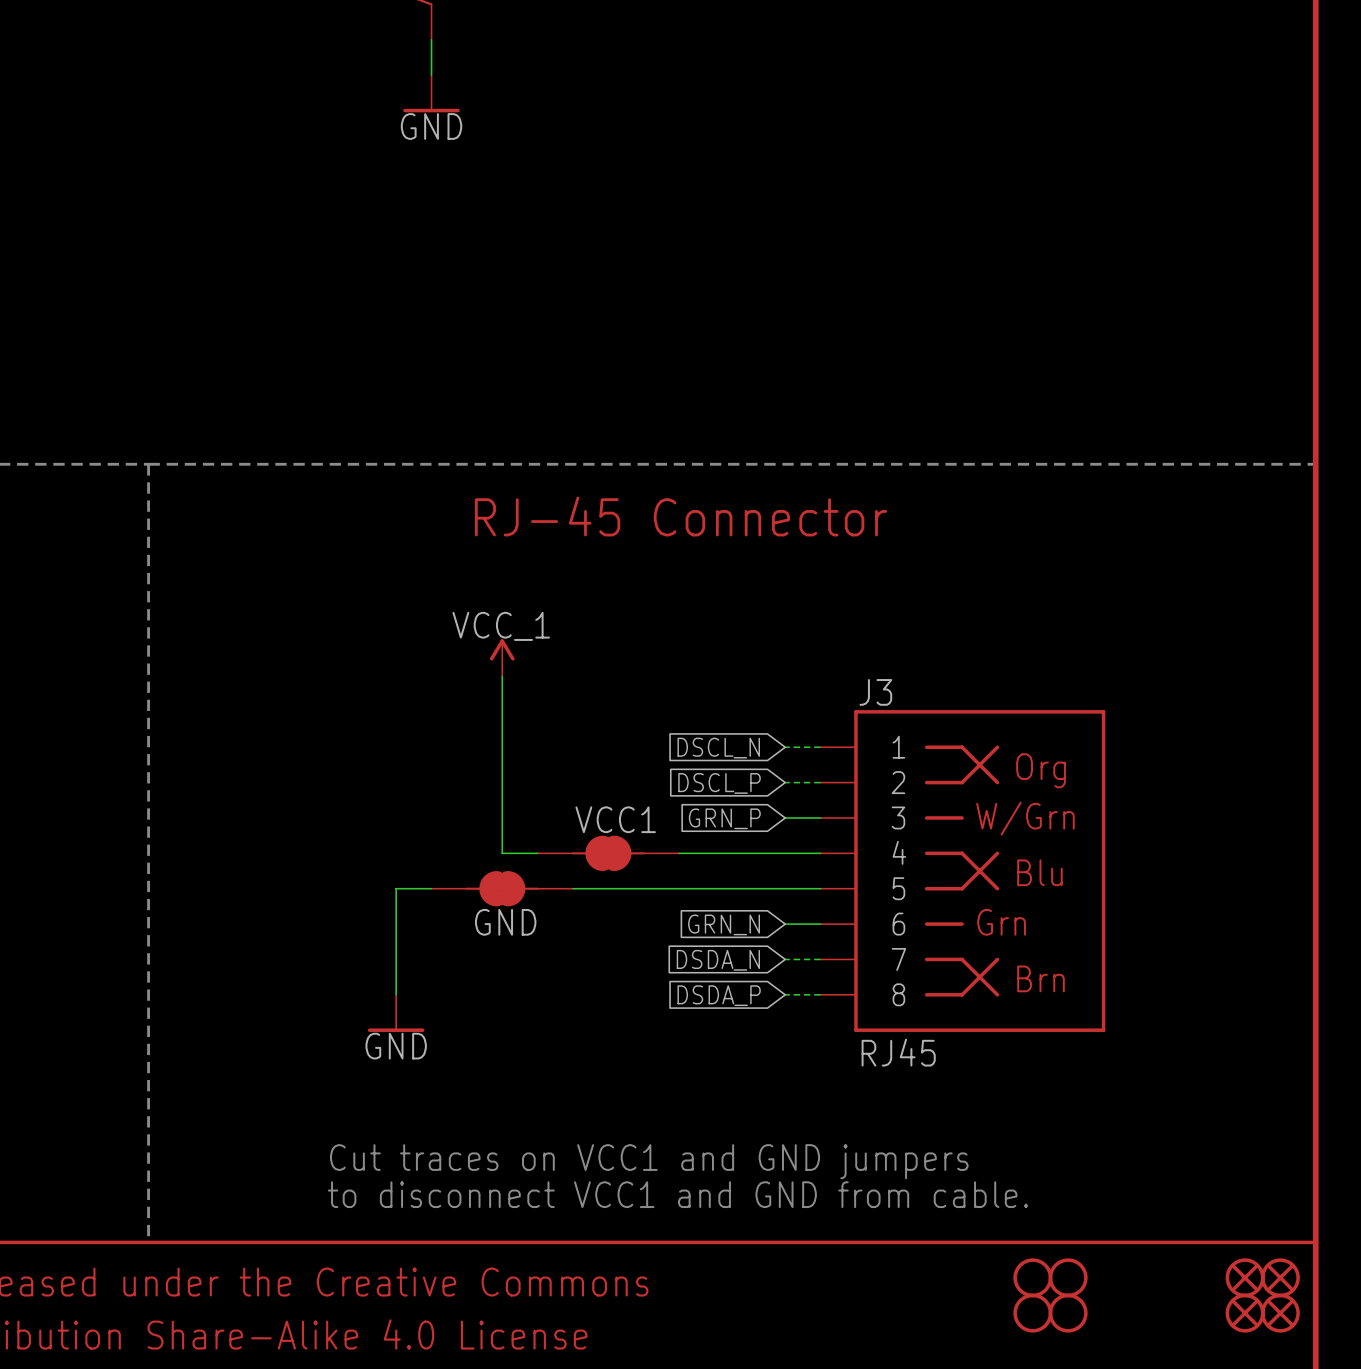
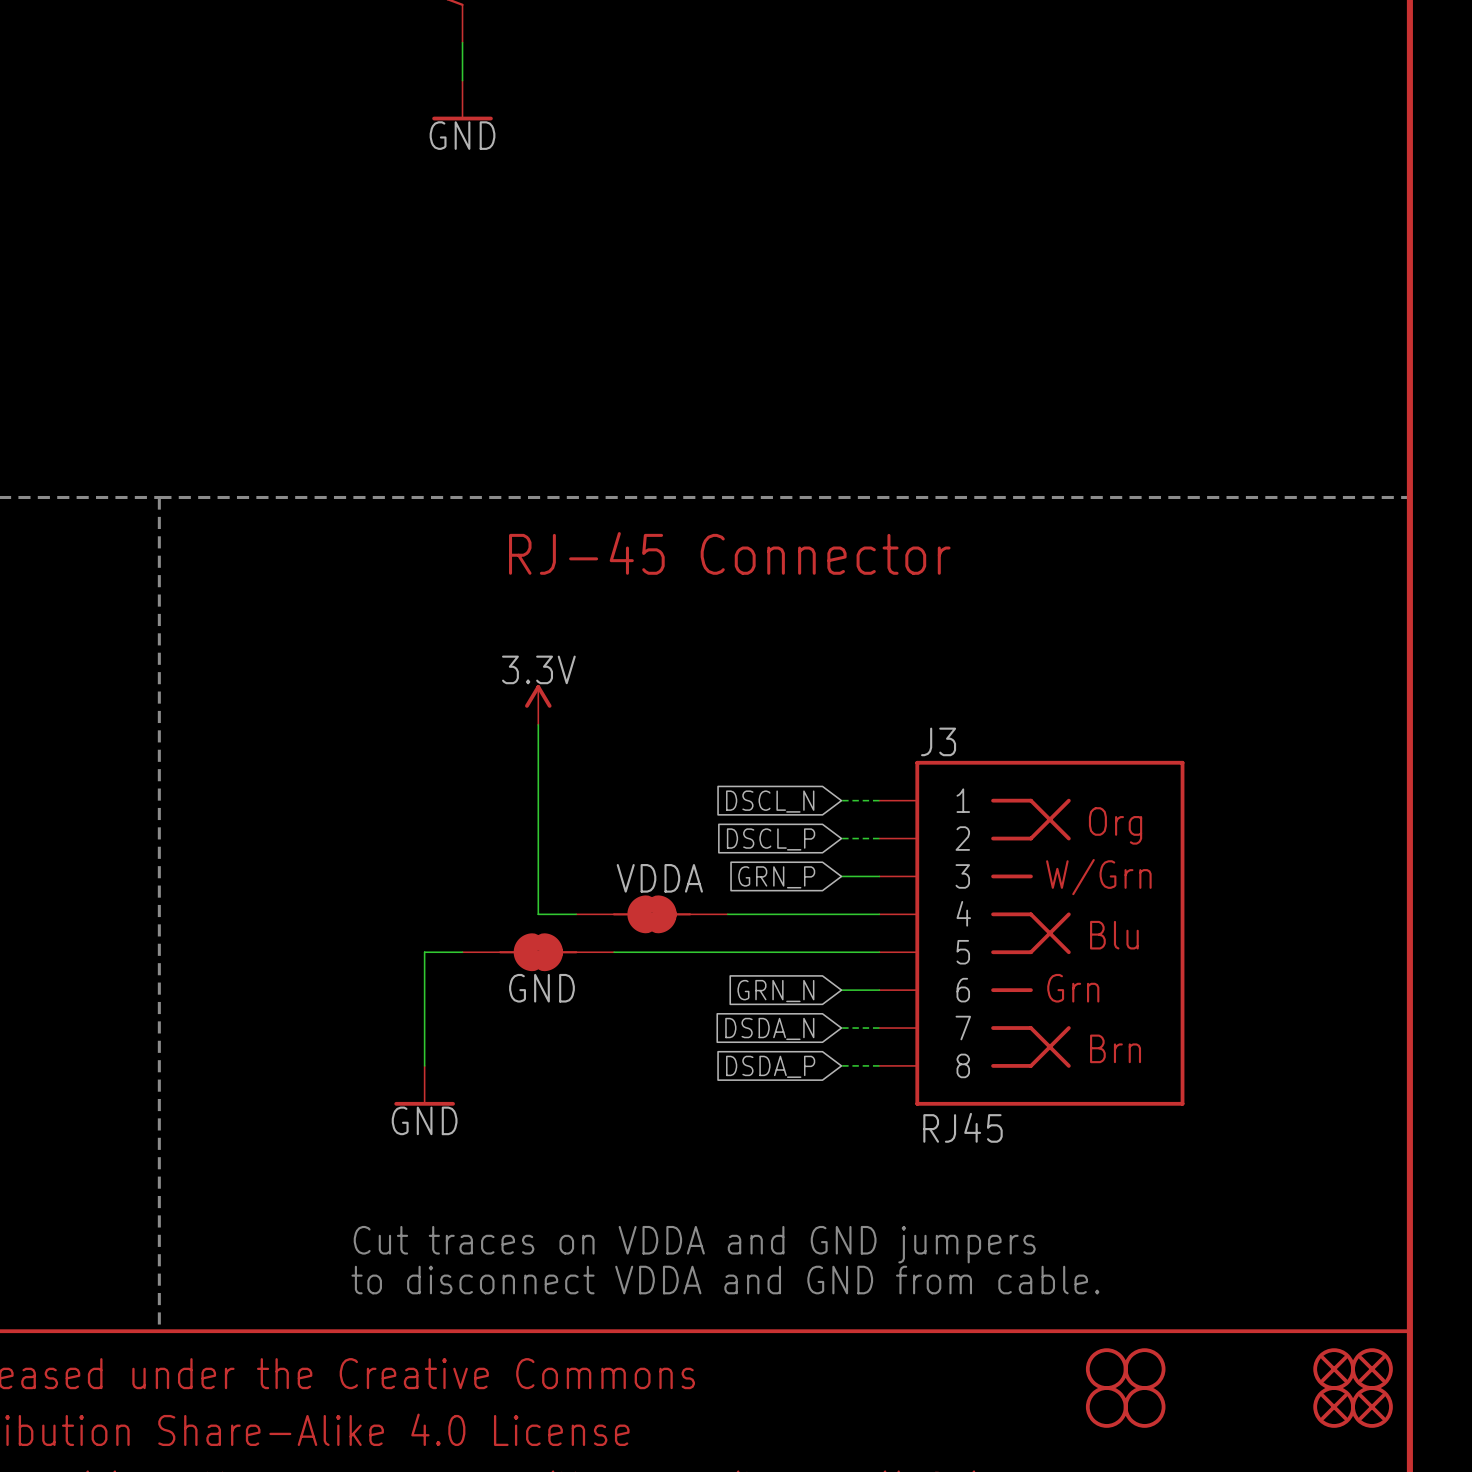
power symbol: VCC_1 (502, 657) -> 3.3V (538, 704)
VCC1 name: VCC1 (615, 819) -> VDDA (659, 878)
text: Cut traces on VCC1 and GND jumpers (649, 1161) -> Cut traces on VDDA and GND jumpers (694, 1244)
text: to disconnect VCC1 and GND from cable. (677, 1194) -> to disconnect VDDA and GND from cable. (725, 1280)

